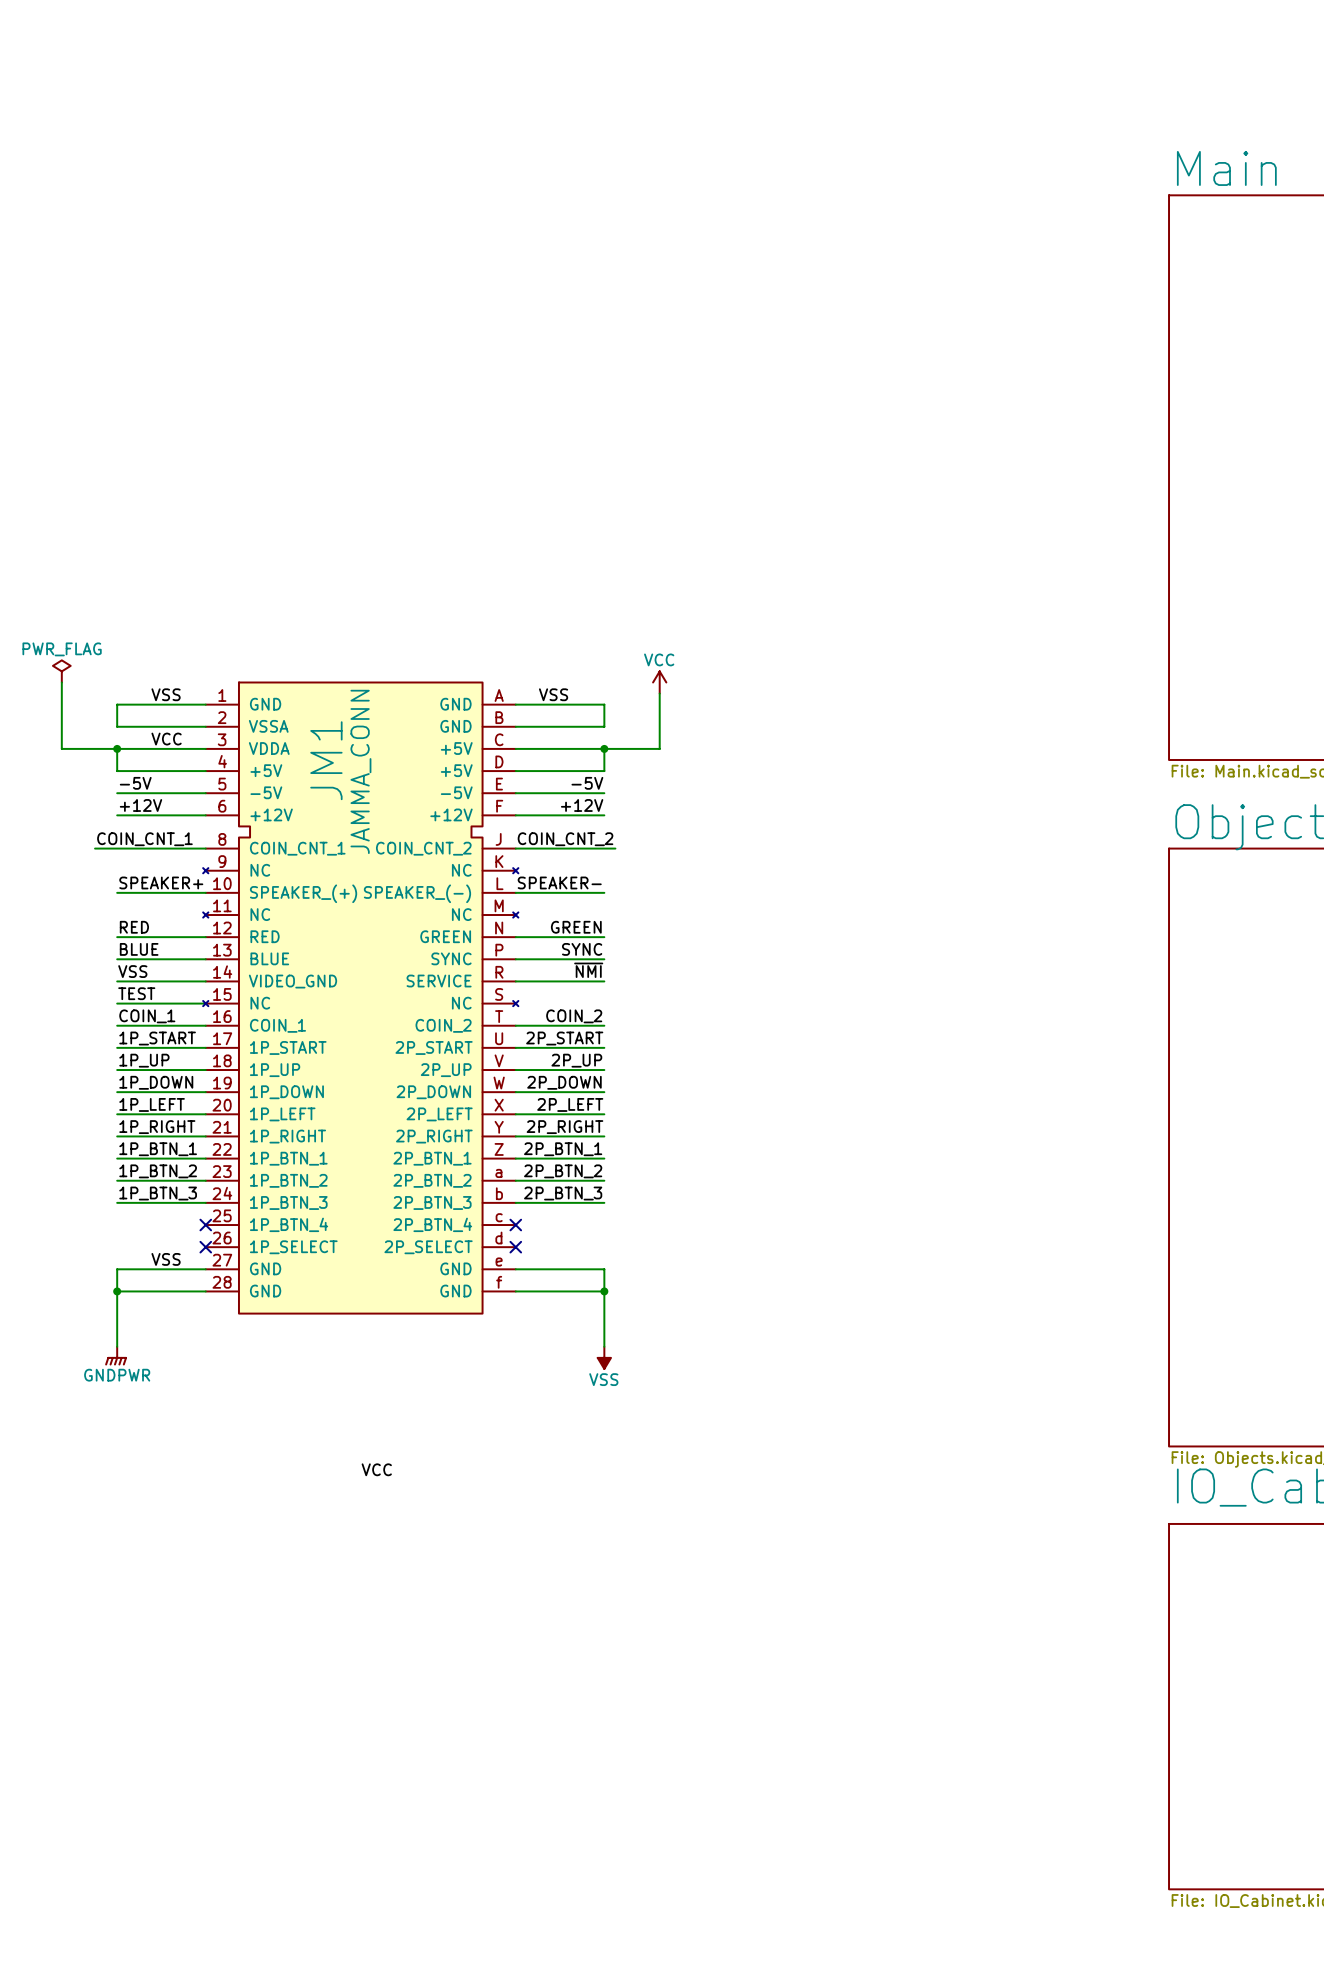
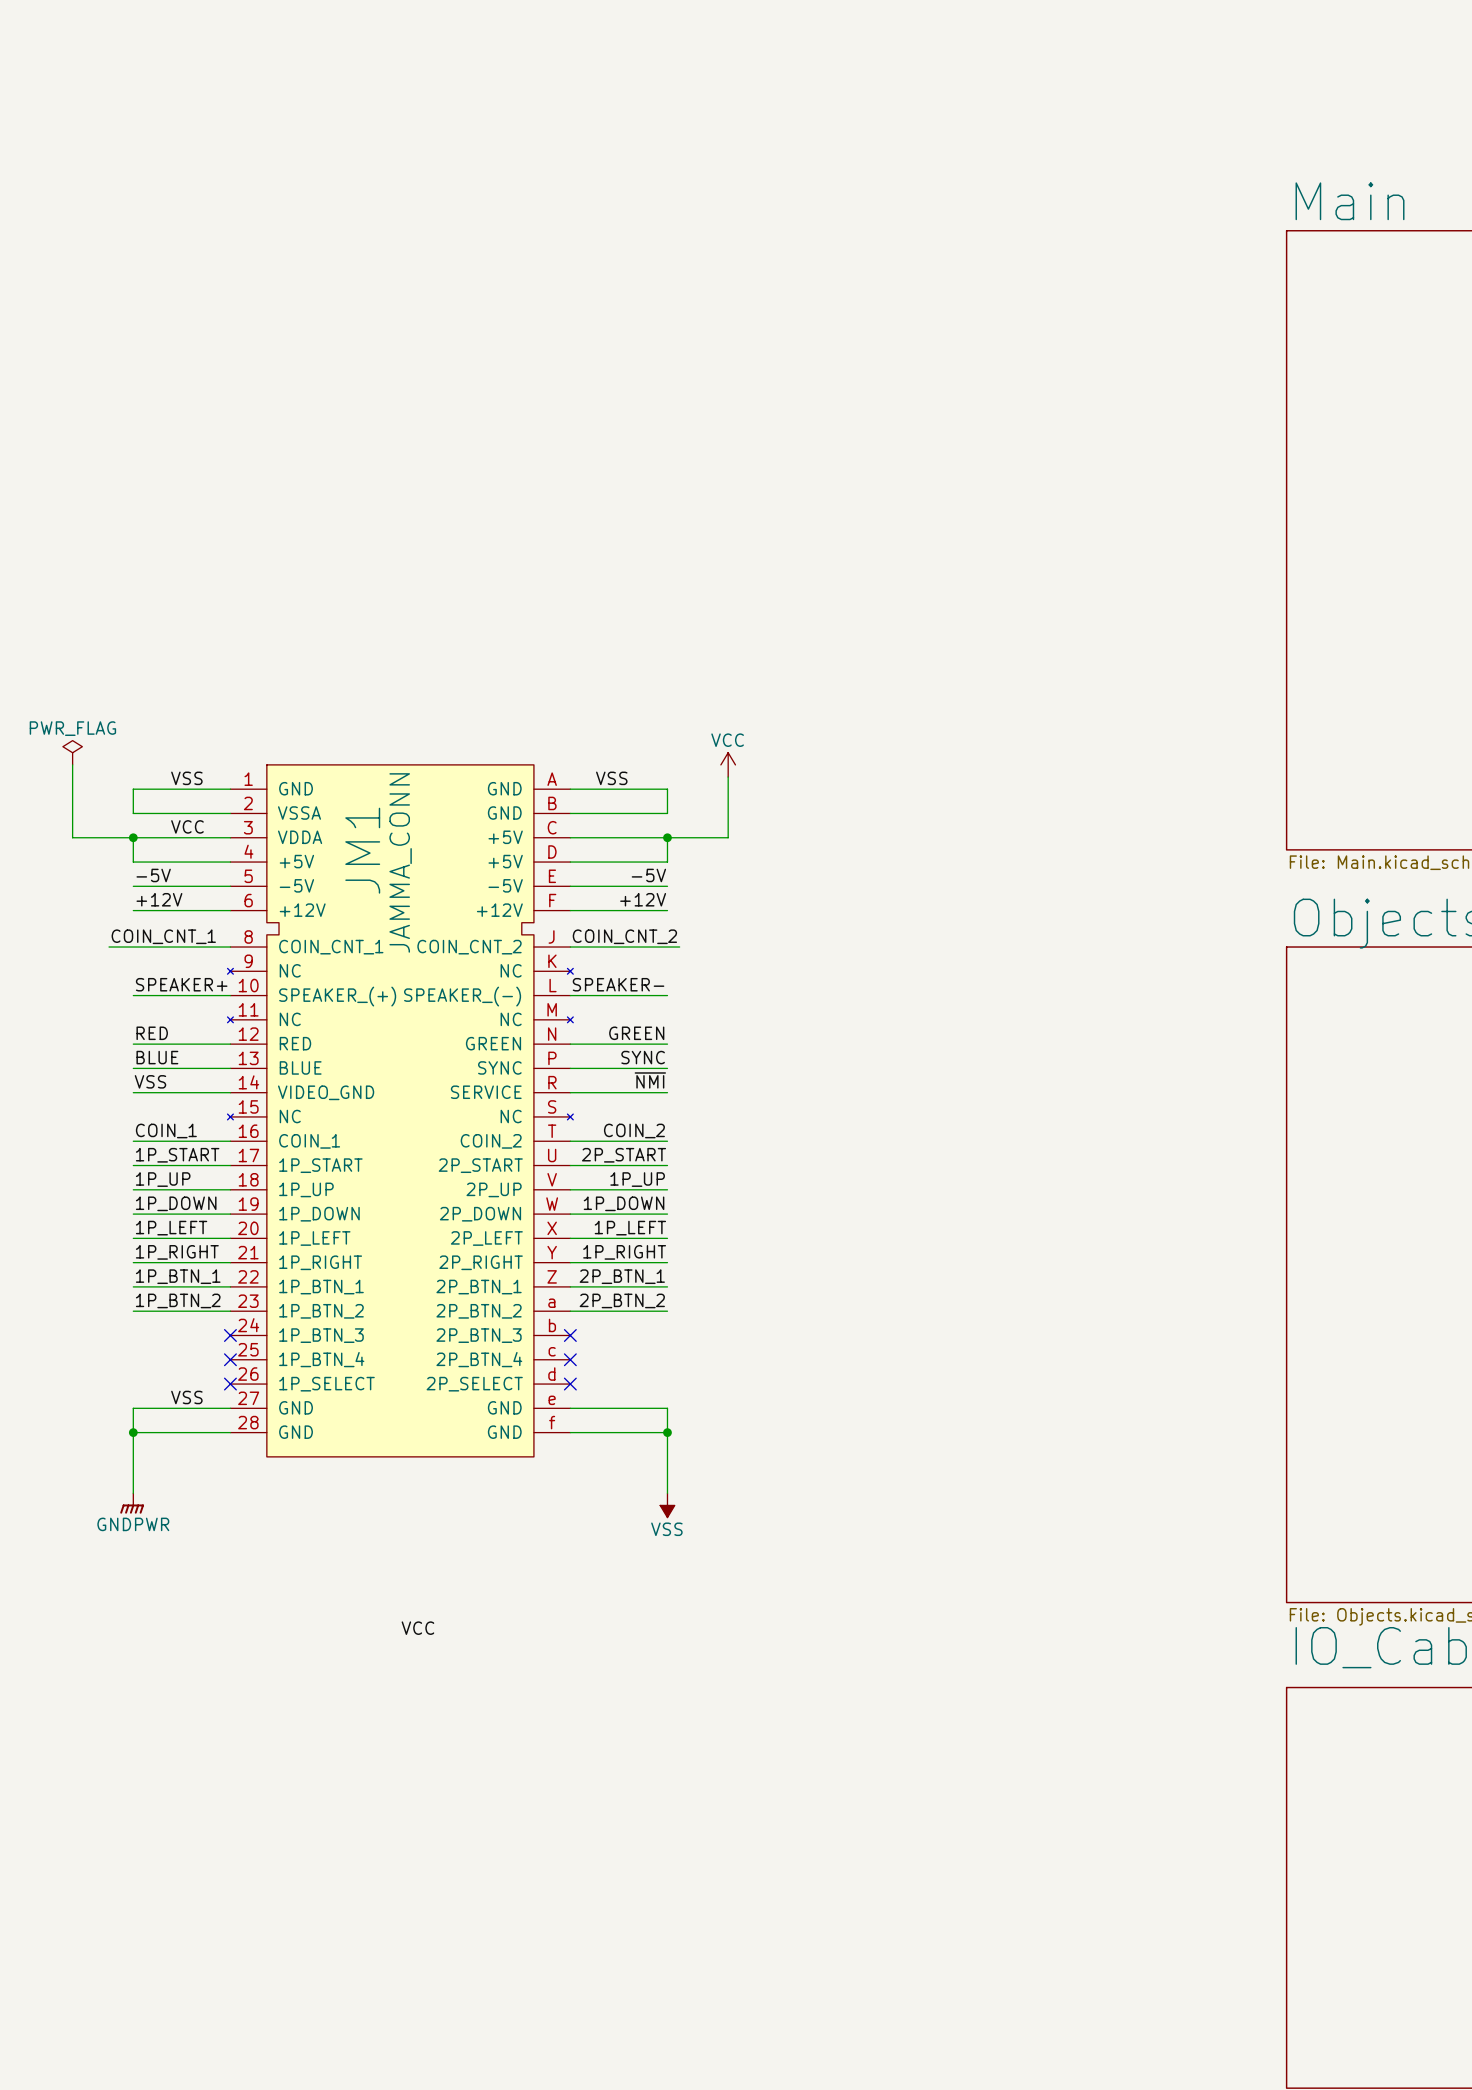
label: TEST (136, 993) -> none
wire: (117, 1003) (205, 1003) -> none
label: 2P_UP (576, 1060) -> 1P_UP (637, 1179)
label: 2P_DOWN (564, 1082) -> 1P_DOWN (624, 1203)
label: 2P_LEFT (570, 1104) -> 1P_LEFT (630, 1228)
label: 2P_RIGHT (564, 1127) -> 1P_RIGHT (624, 1252)
label: 1P_BTN_3 (158, 1193) -> none
label: 2P_BTN_3 (563, 1193) -> none
wire: (117, 1202) (205, 1202) -> none
no-connect mark: none -> (230, 1335)
wire: (515, 1202) (604, 1202) -> none
no-connect mark: none -> (570, 1335)

